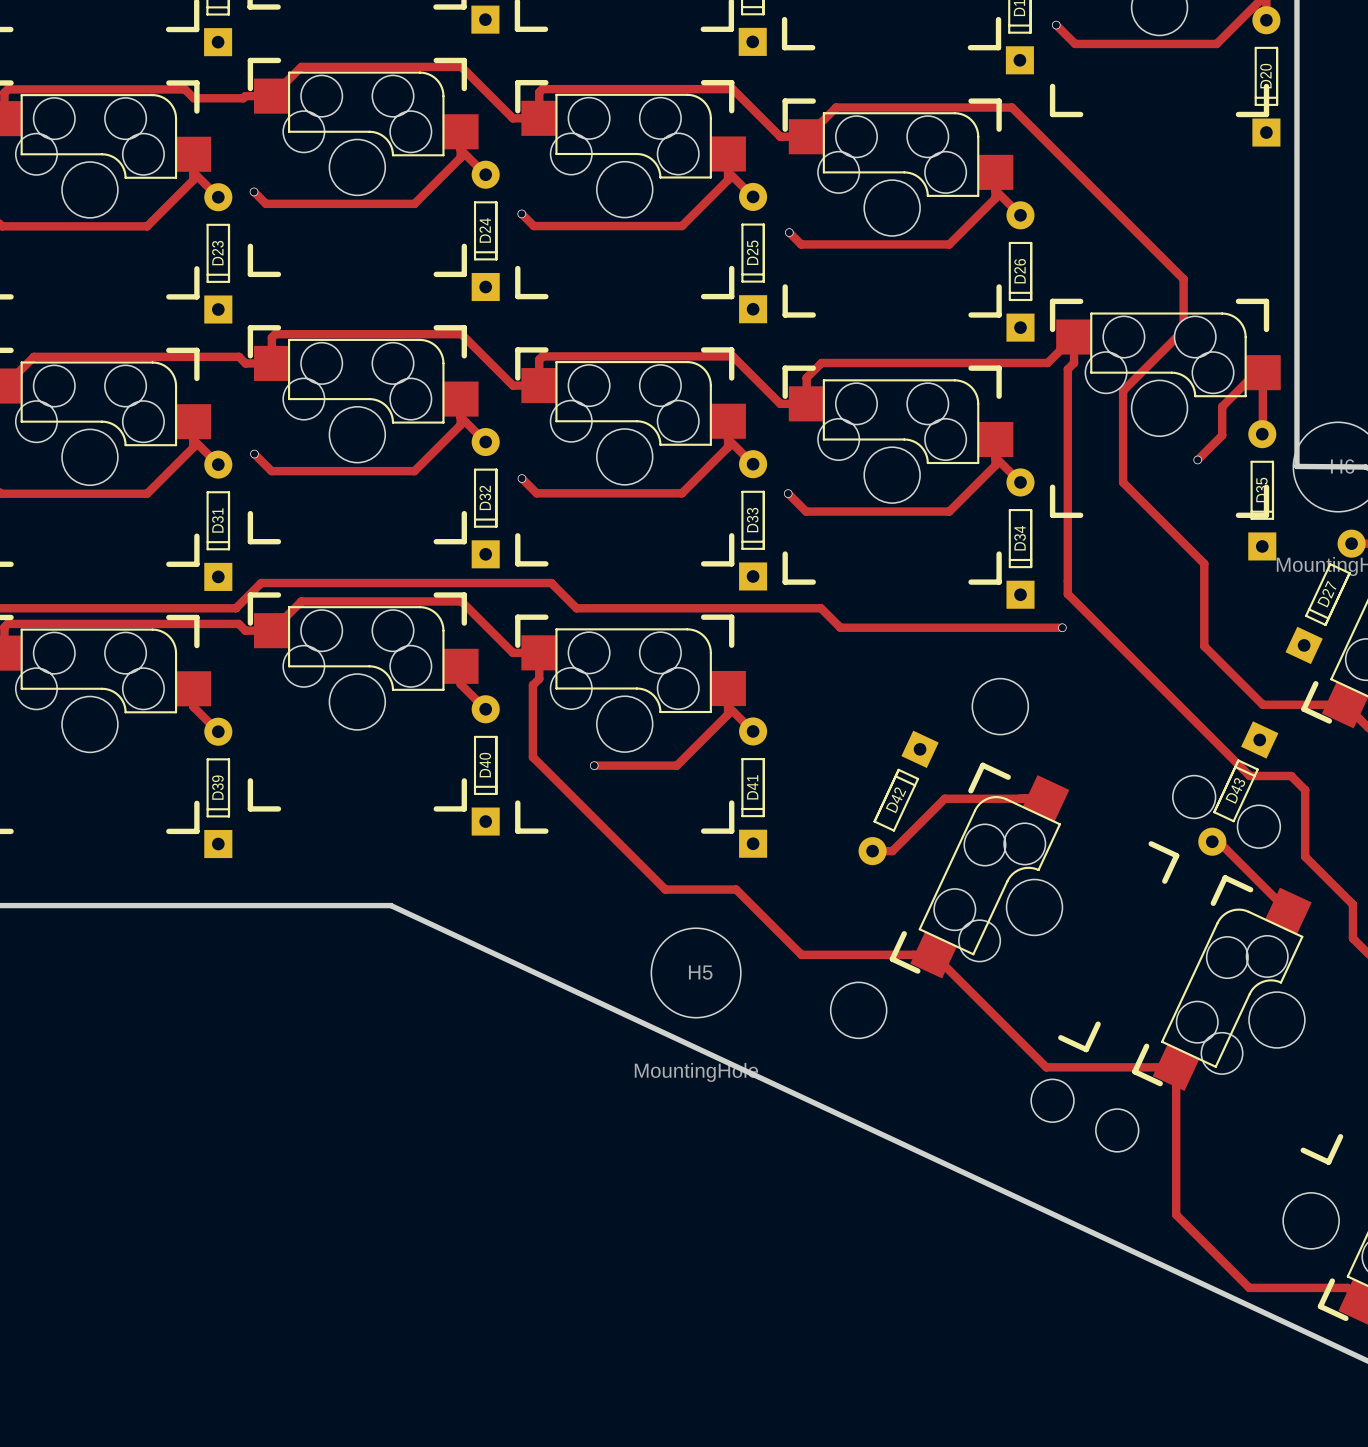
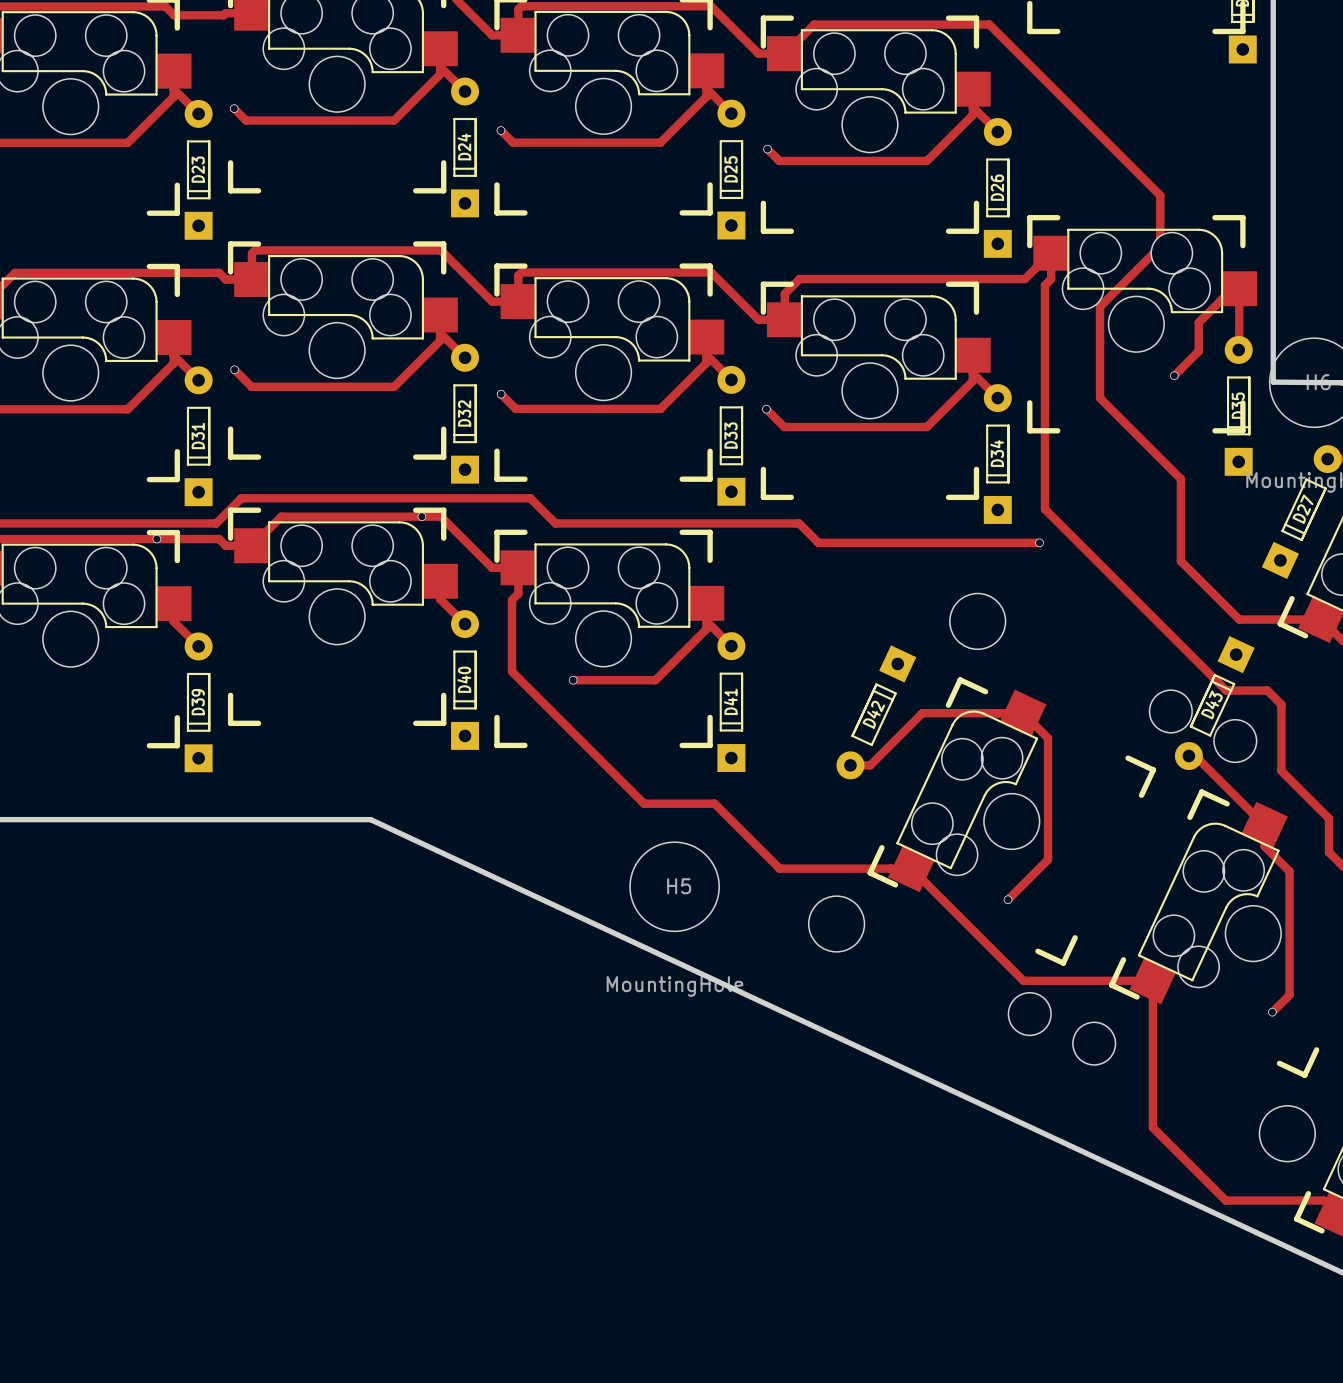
via: none -> (421, 516)
via: none -> (156, 539)
track: none -> (1023, 713) (1048, 738) (1048, 859) (1008, 899)
track: none -> (1264, 825) (1264, 846) (1289, 871) (1289, 995) (1272, 1012)
via: none -> (1008, 899)
via: none -> (1272, 1012)

